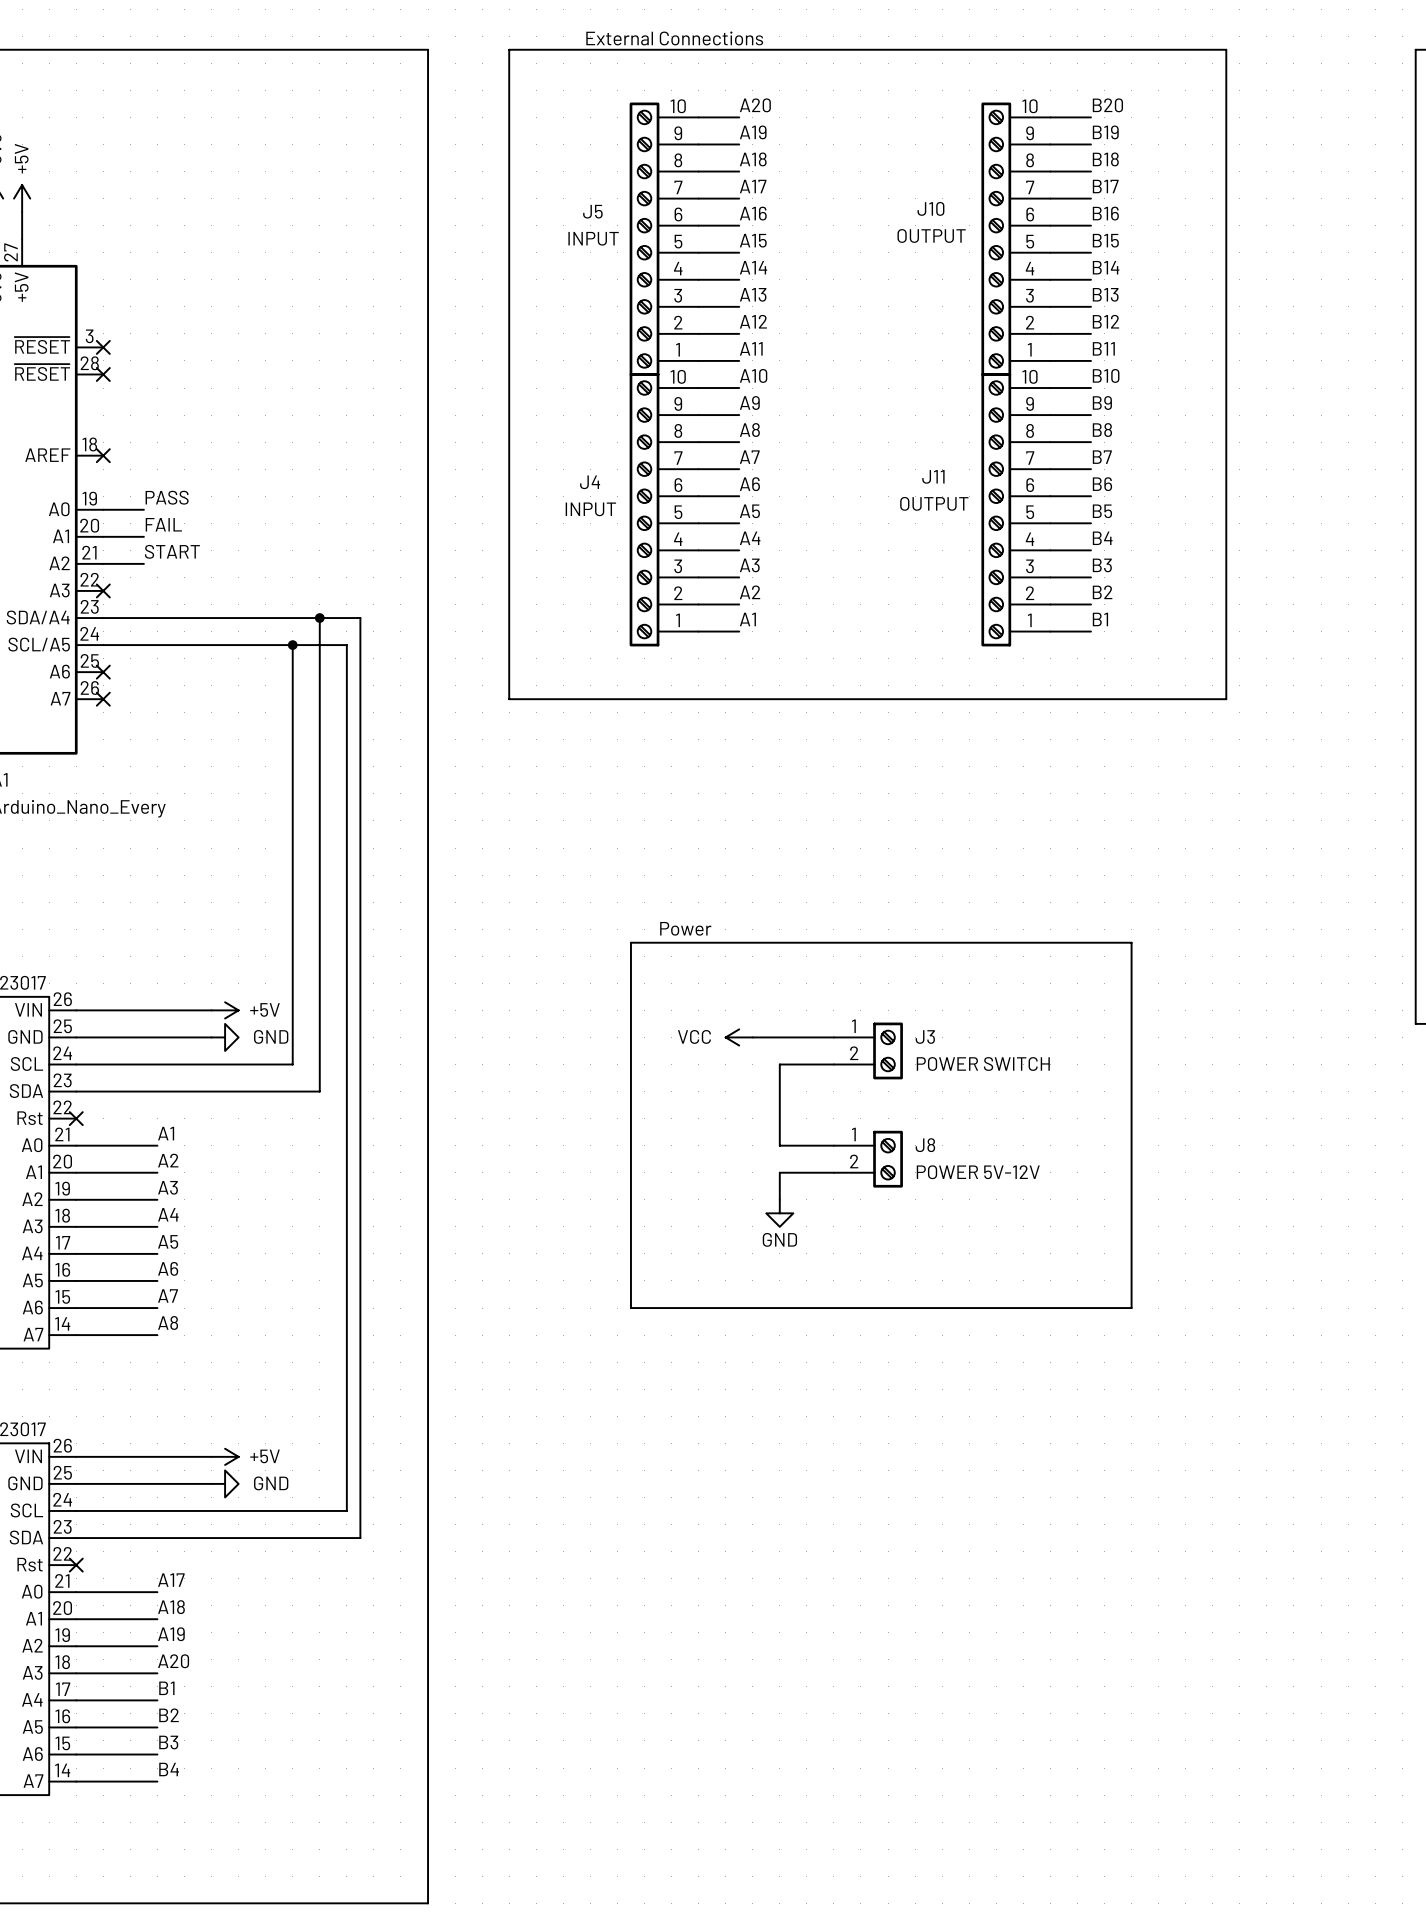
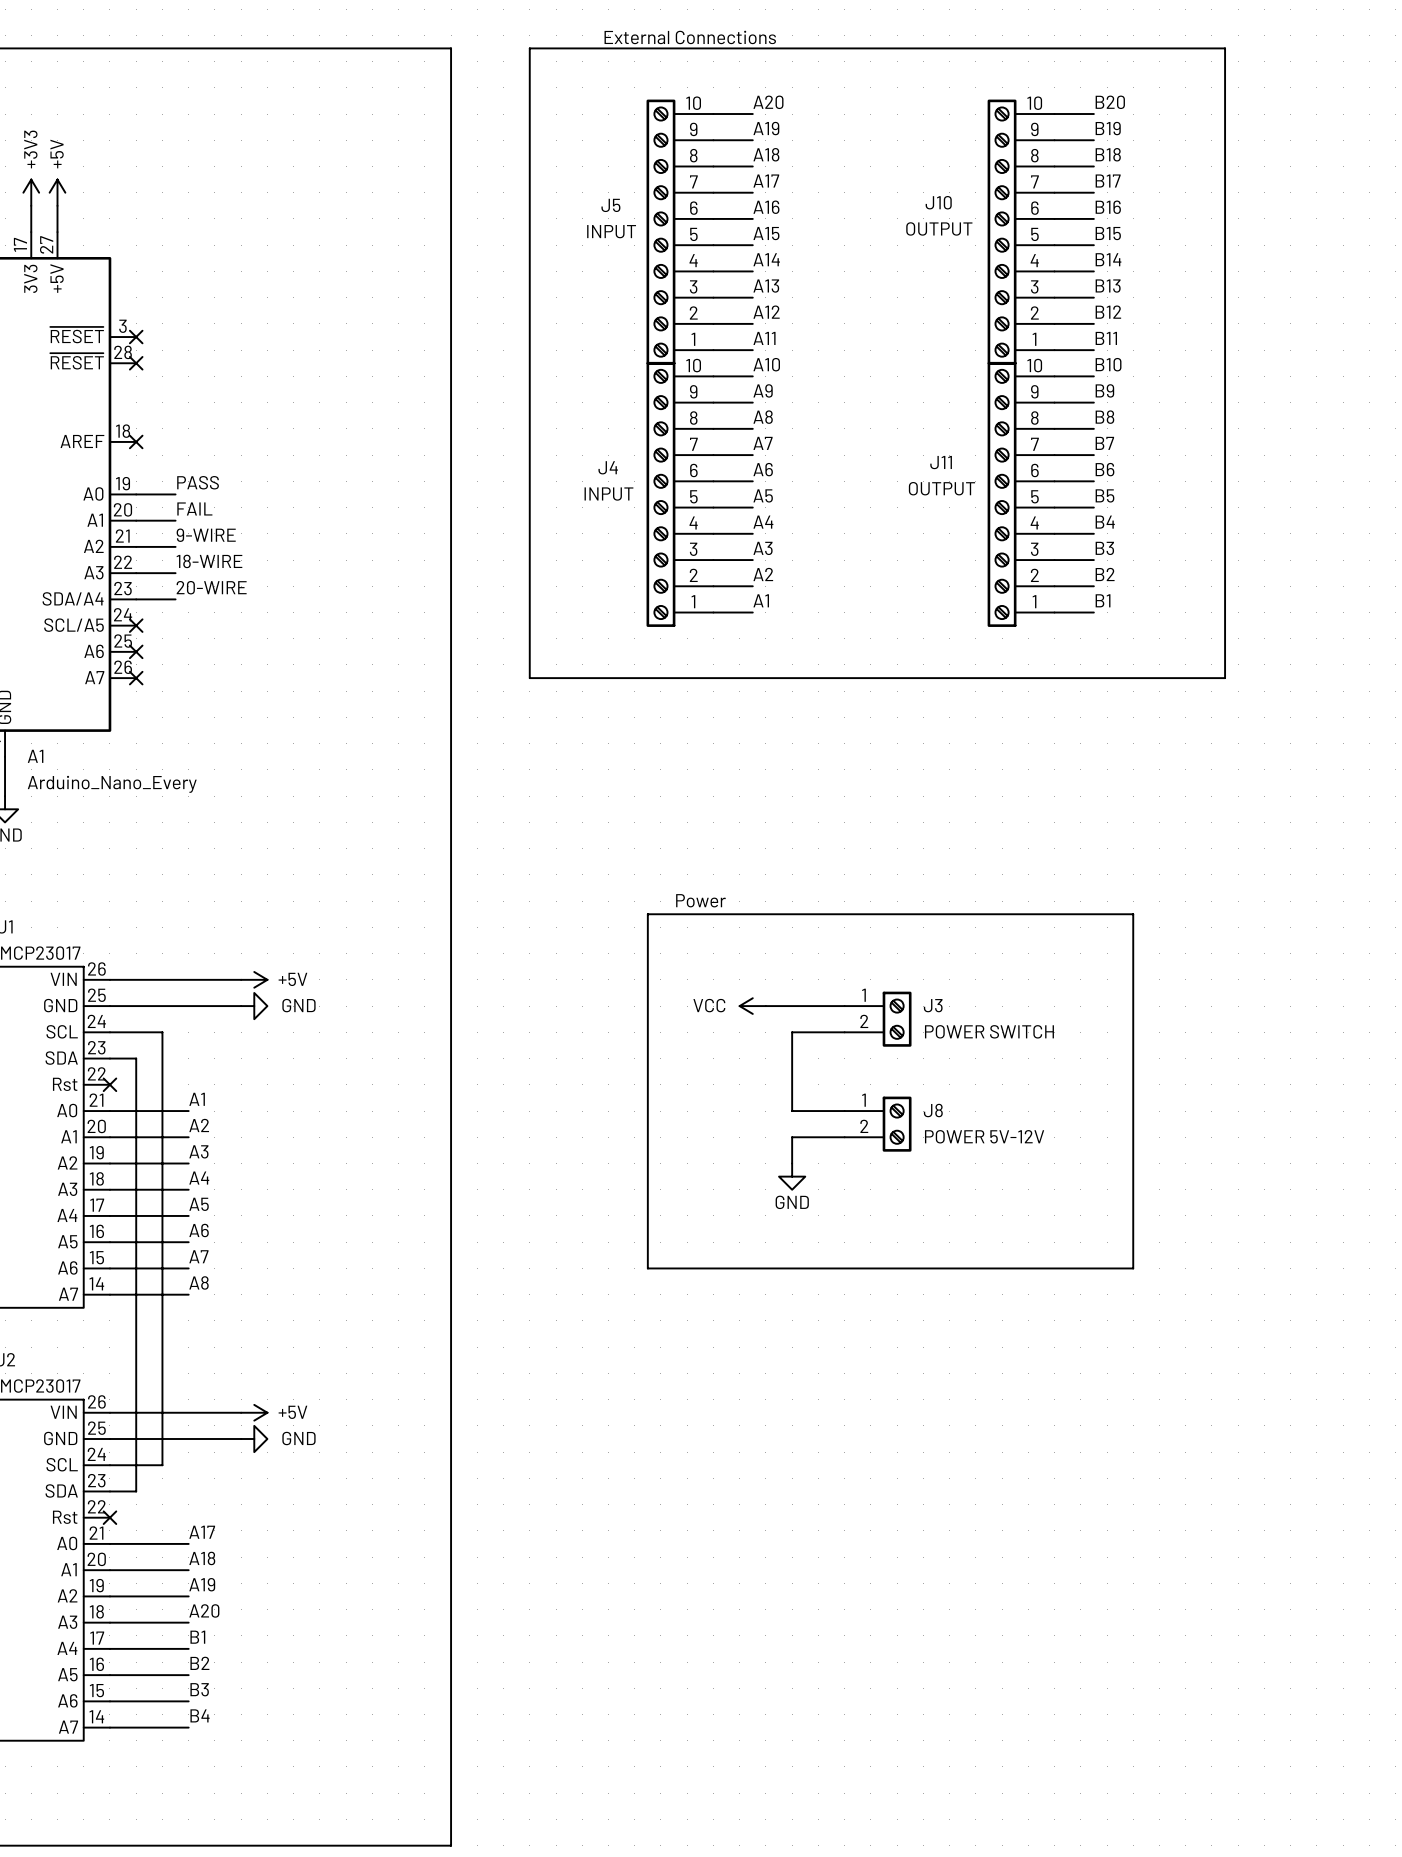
label: START (172, 551) -> 9-WIRE (206, 535)
label: none -> 18-WIRE (209, 561)
wire: none -> (136, 573) (175, 573)
no-connect mark position: (103, 590) -> (136, 625)
label: none -> 20-WIRE (211, 587)
wire: (143, 618) (360, 618) (360, 1538) (103, 1538) -> (136, 1058) (136, 1491)
wire: (319, 618) (319, 1091) (103, 1091) -> none
junction: (319, 618) -> none
wire: (103, 645) (346, 645) (346, 1510) (130, 1510) -> (162, 1032) (162, 1465)
wire: (292, 645) (292, 1064) (130, 1064) -> none
junction: (292, 645) -> none

